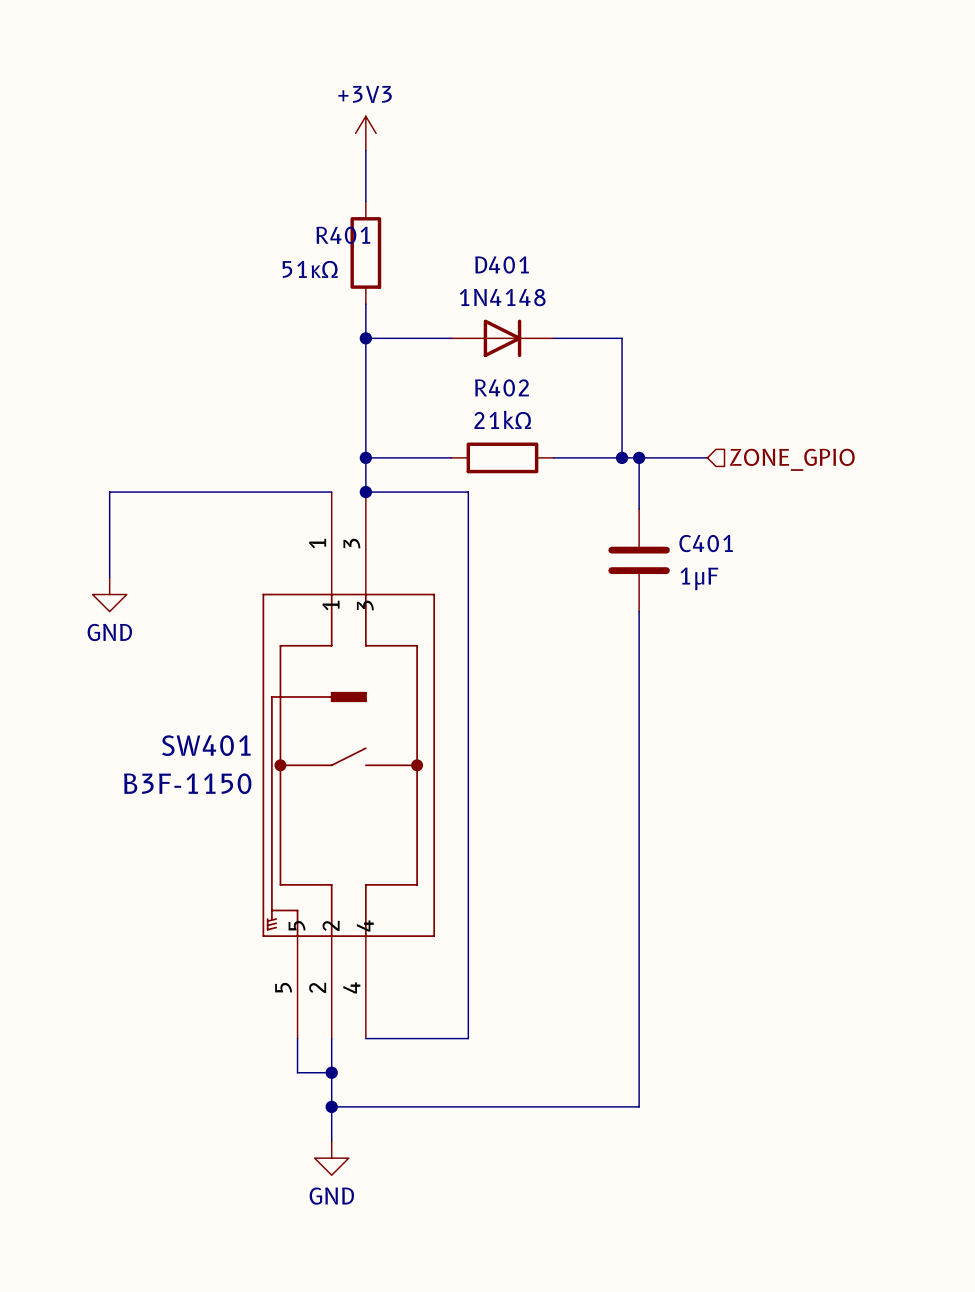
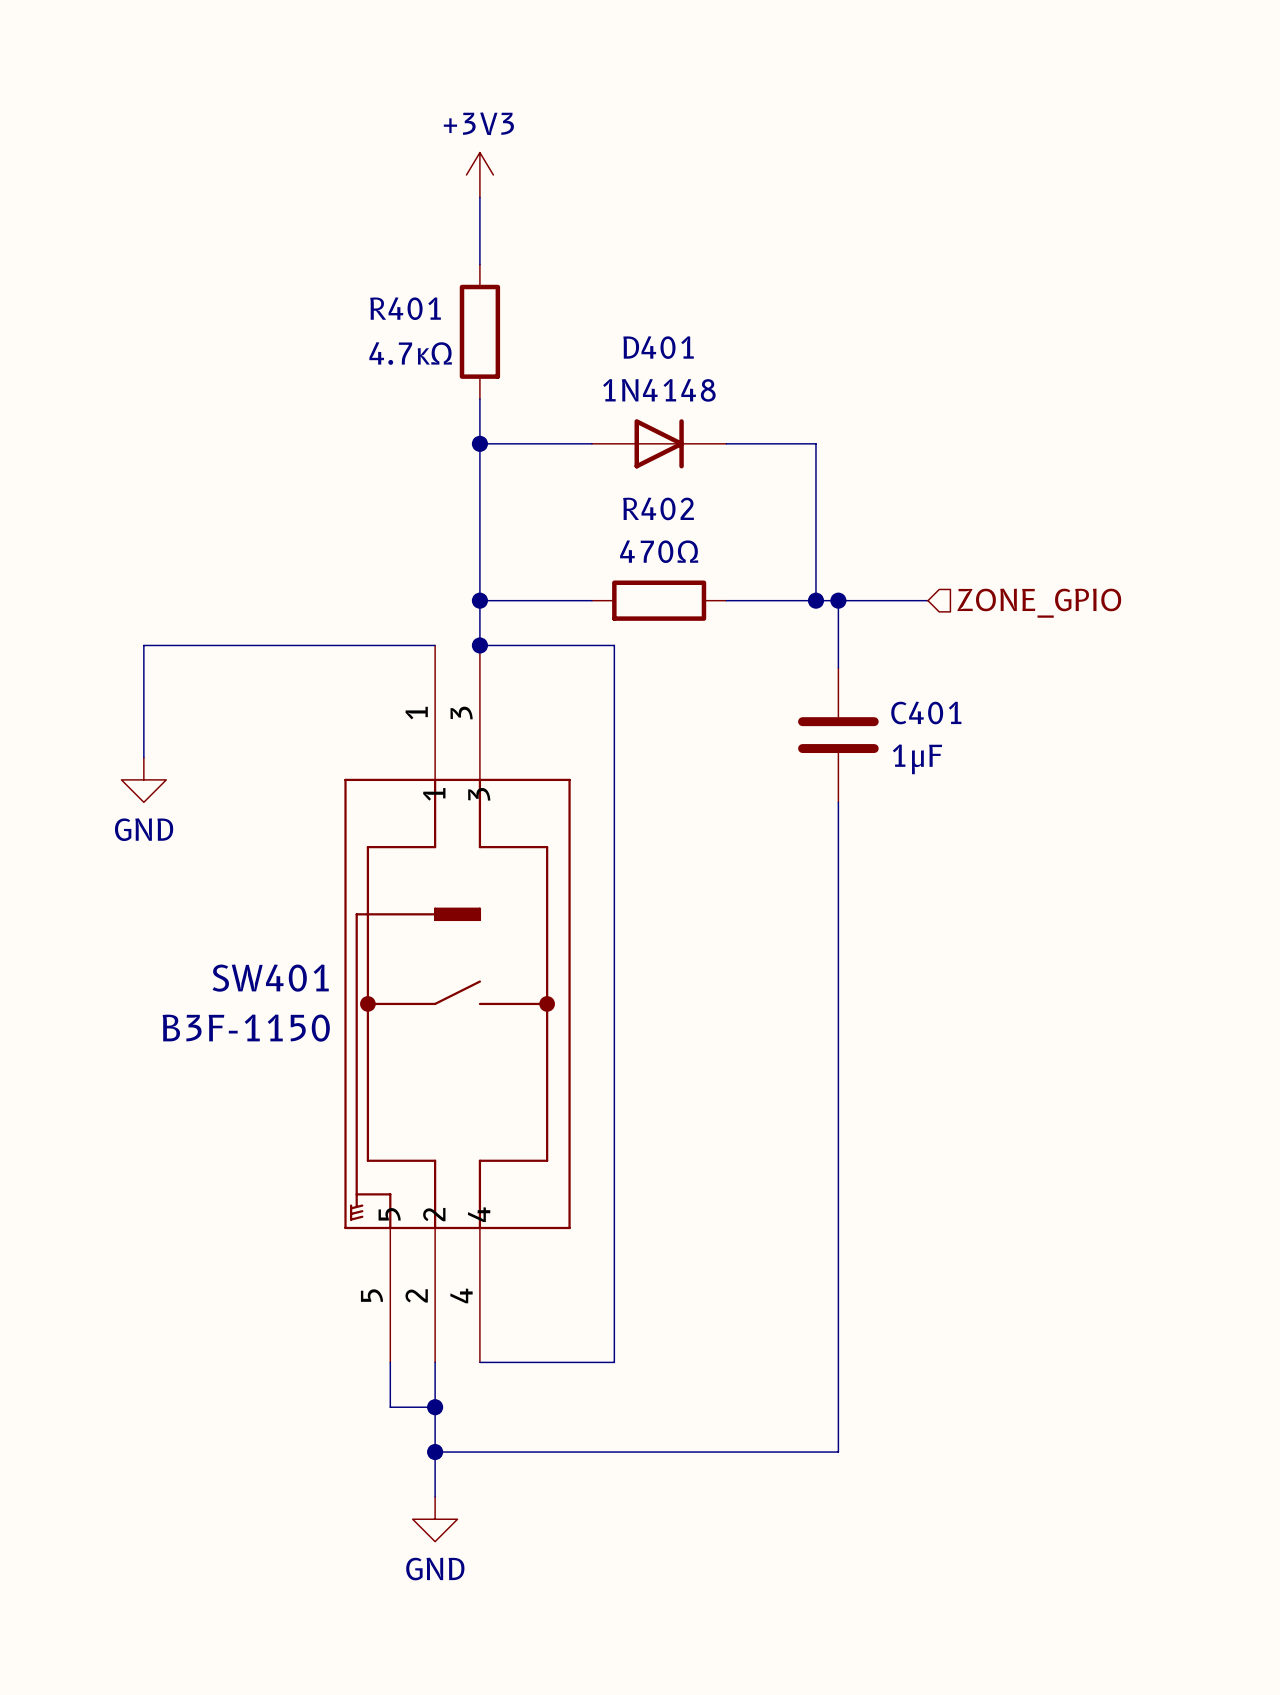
R401 name position: R401 (343, 235) -> R401 (405, 308)
R401 value: 51κΩ (310, 269) -> 4.7κΩ (410, 353)
R402 value: 21kΩ (502, 419) -> 470Ω (659, 551)

